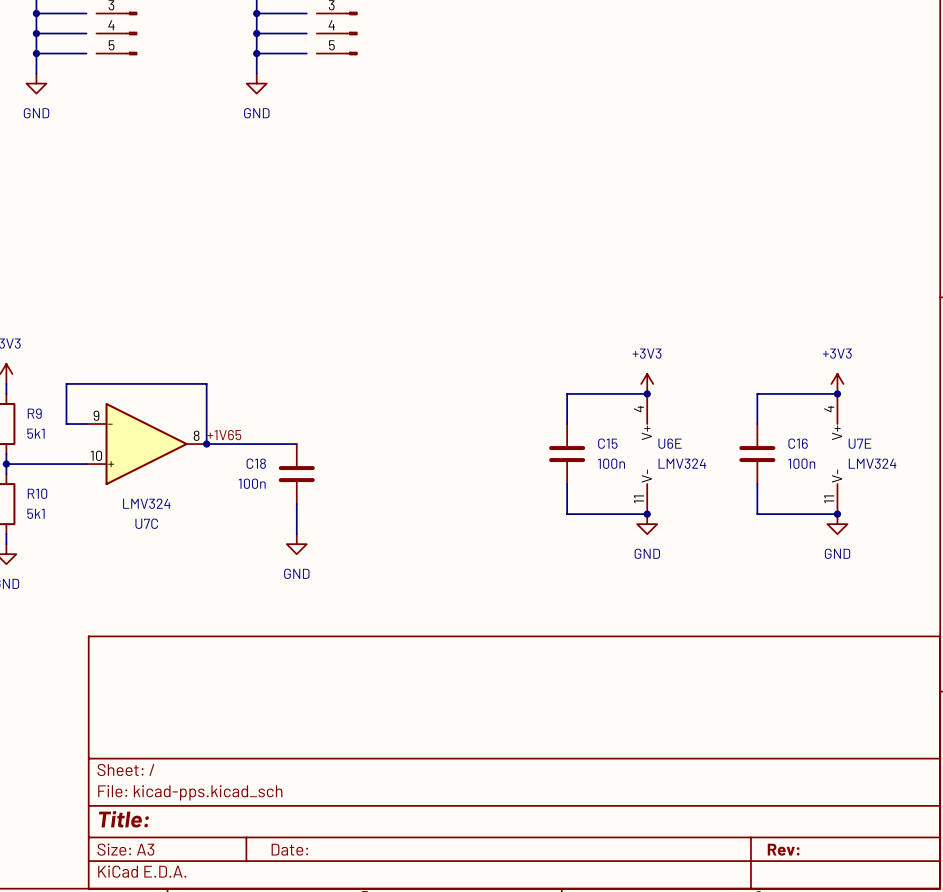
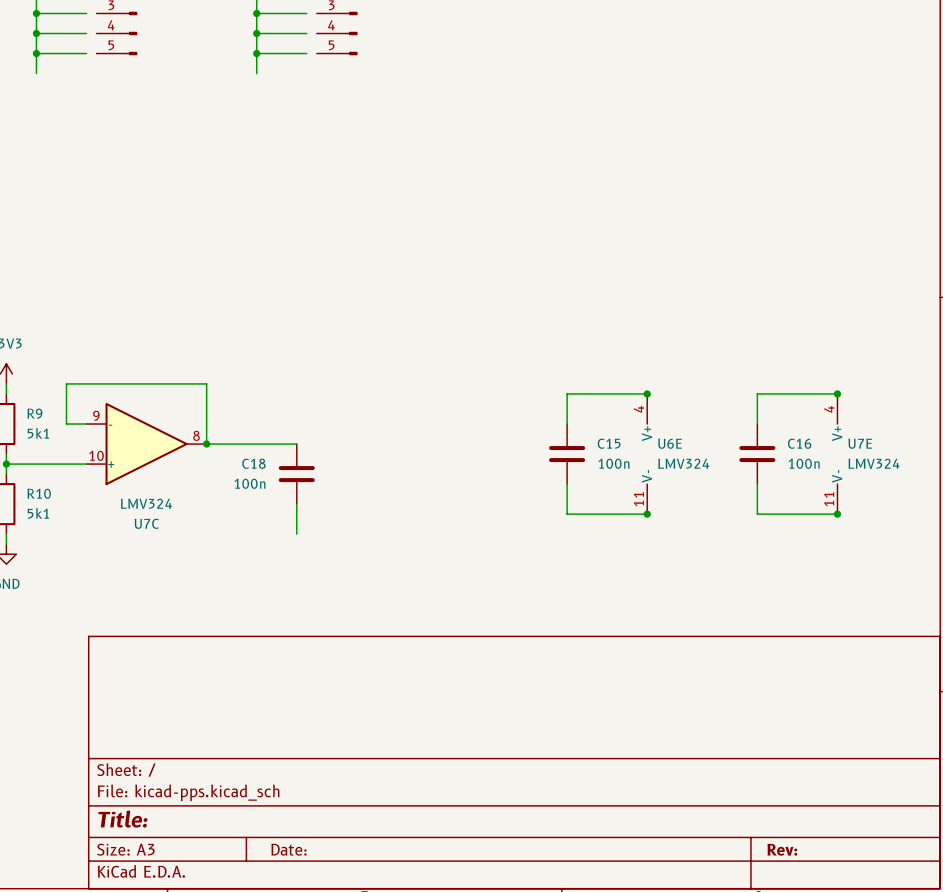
power symbol: GND (36, 83) -> none
power symbol: GND (256, 83) -> none
power symbol: +3V3 (647, 383) -> none
power symbol: +3V3 (837, 383) -> none
label: +1V65 (224, 435) -> none
power symbol: GND (647, 524) -> none
power symbol: GND (837, 524) -> none
power symbol: GND (296, 544) -> none

